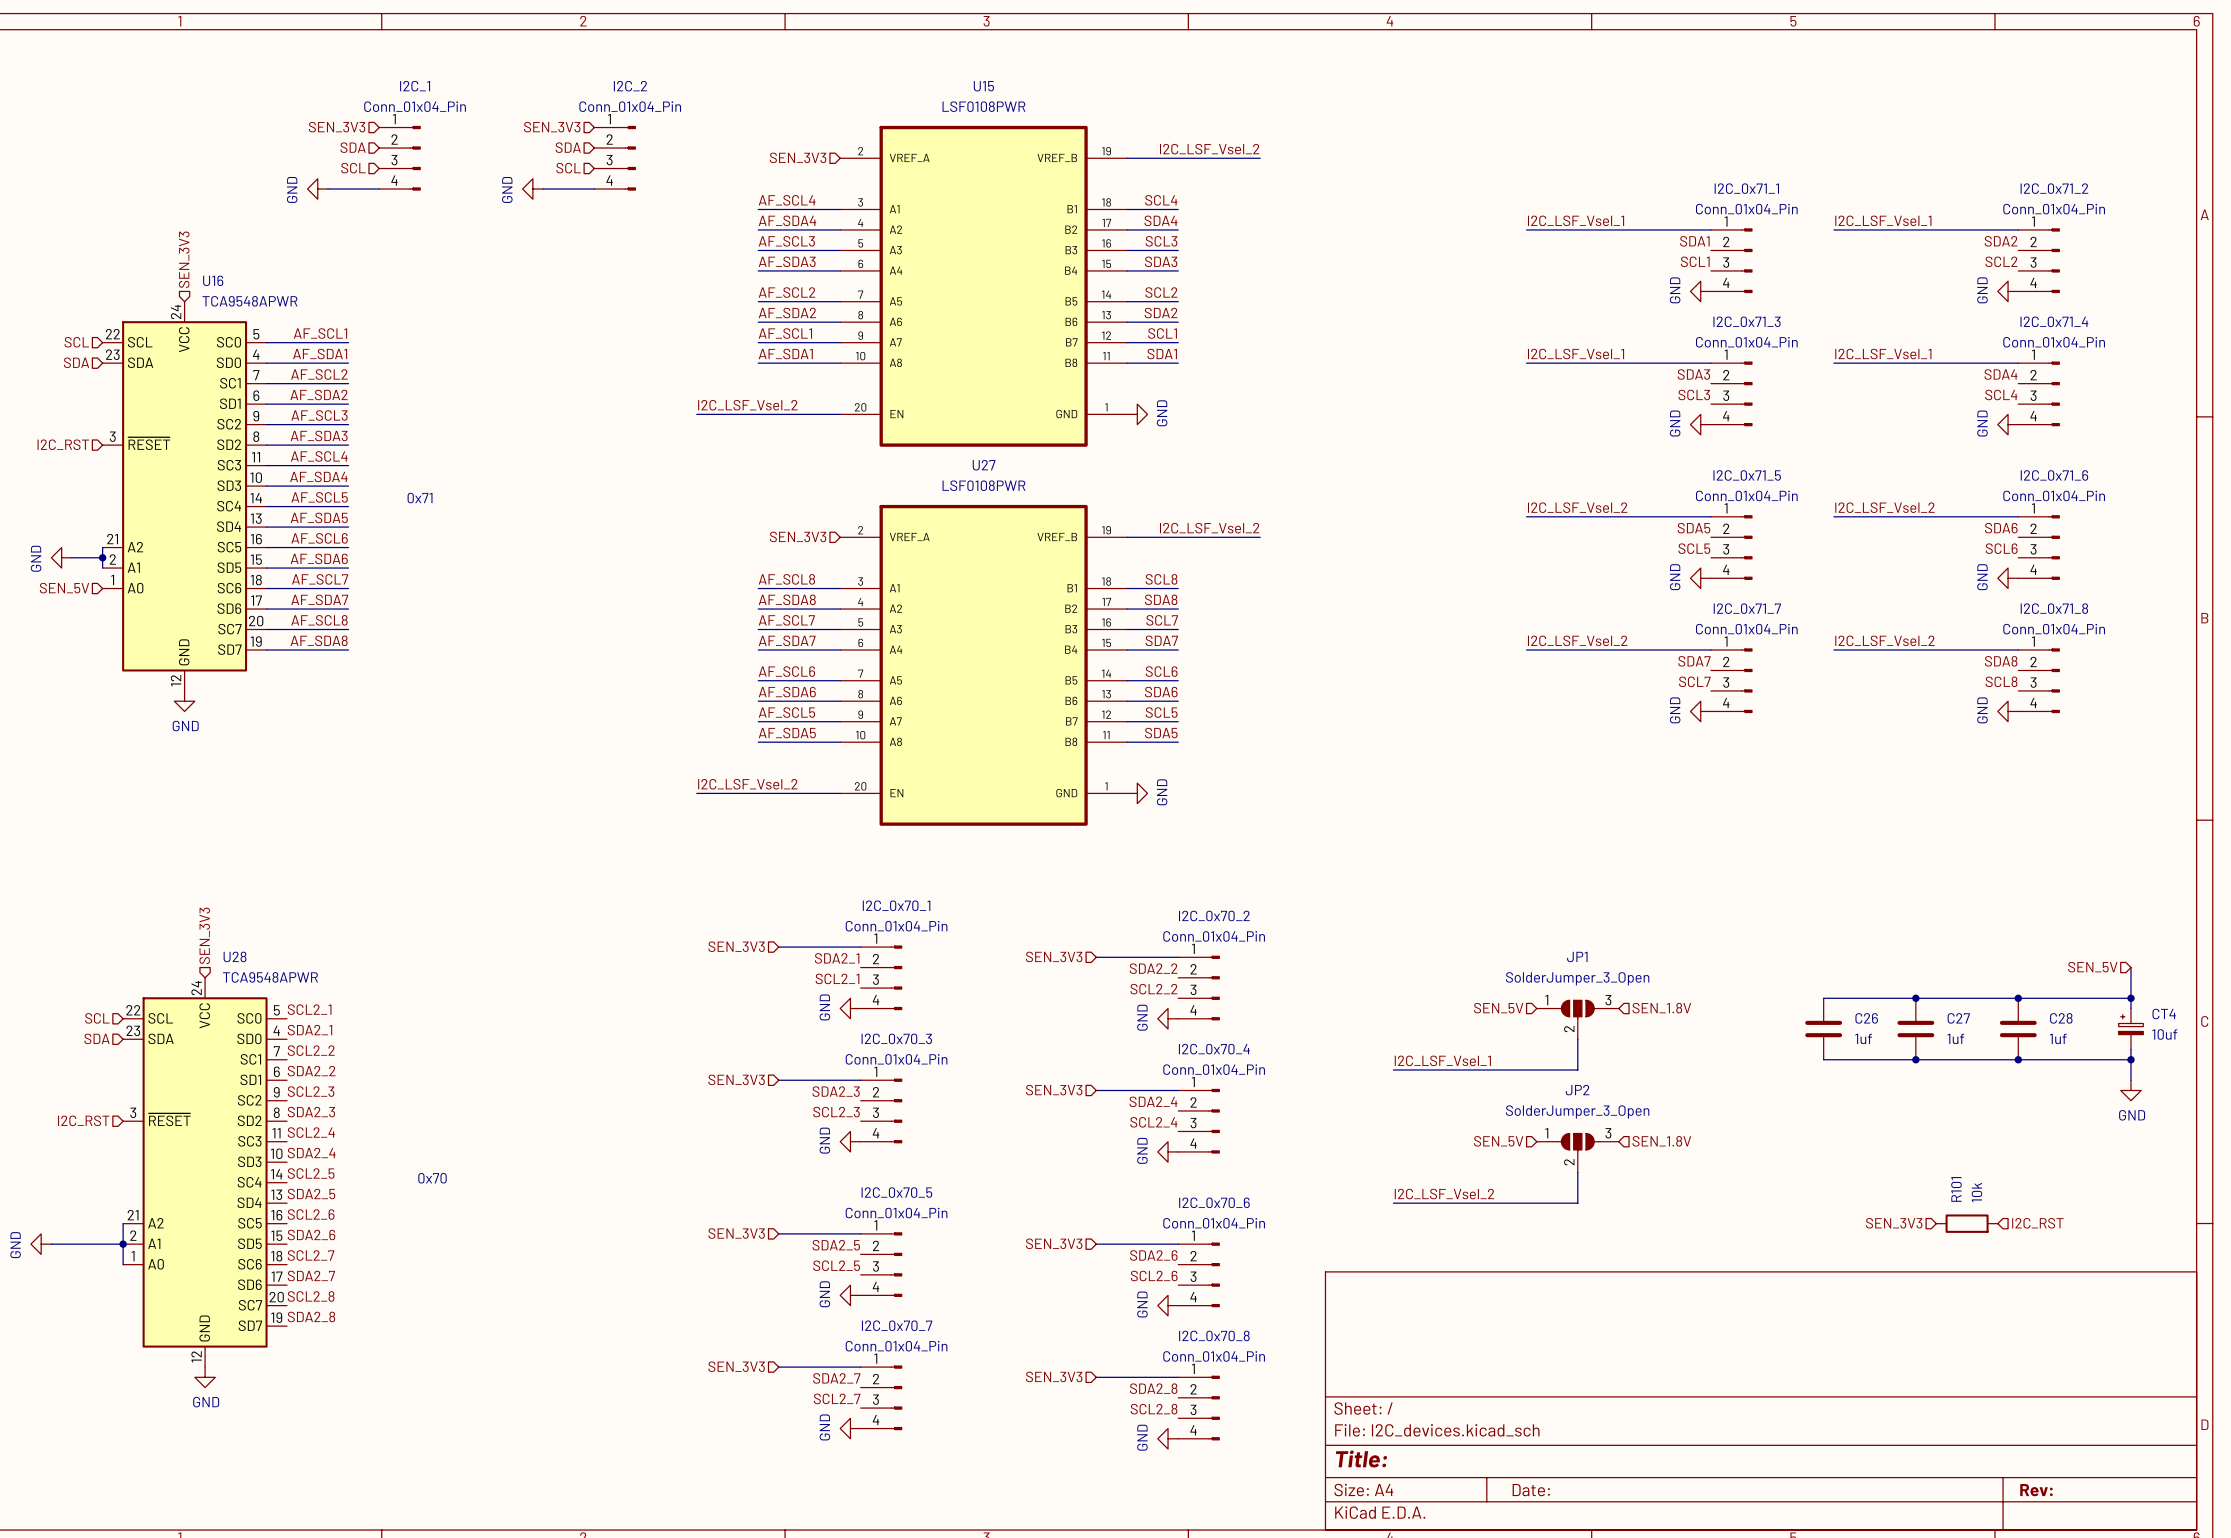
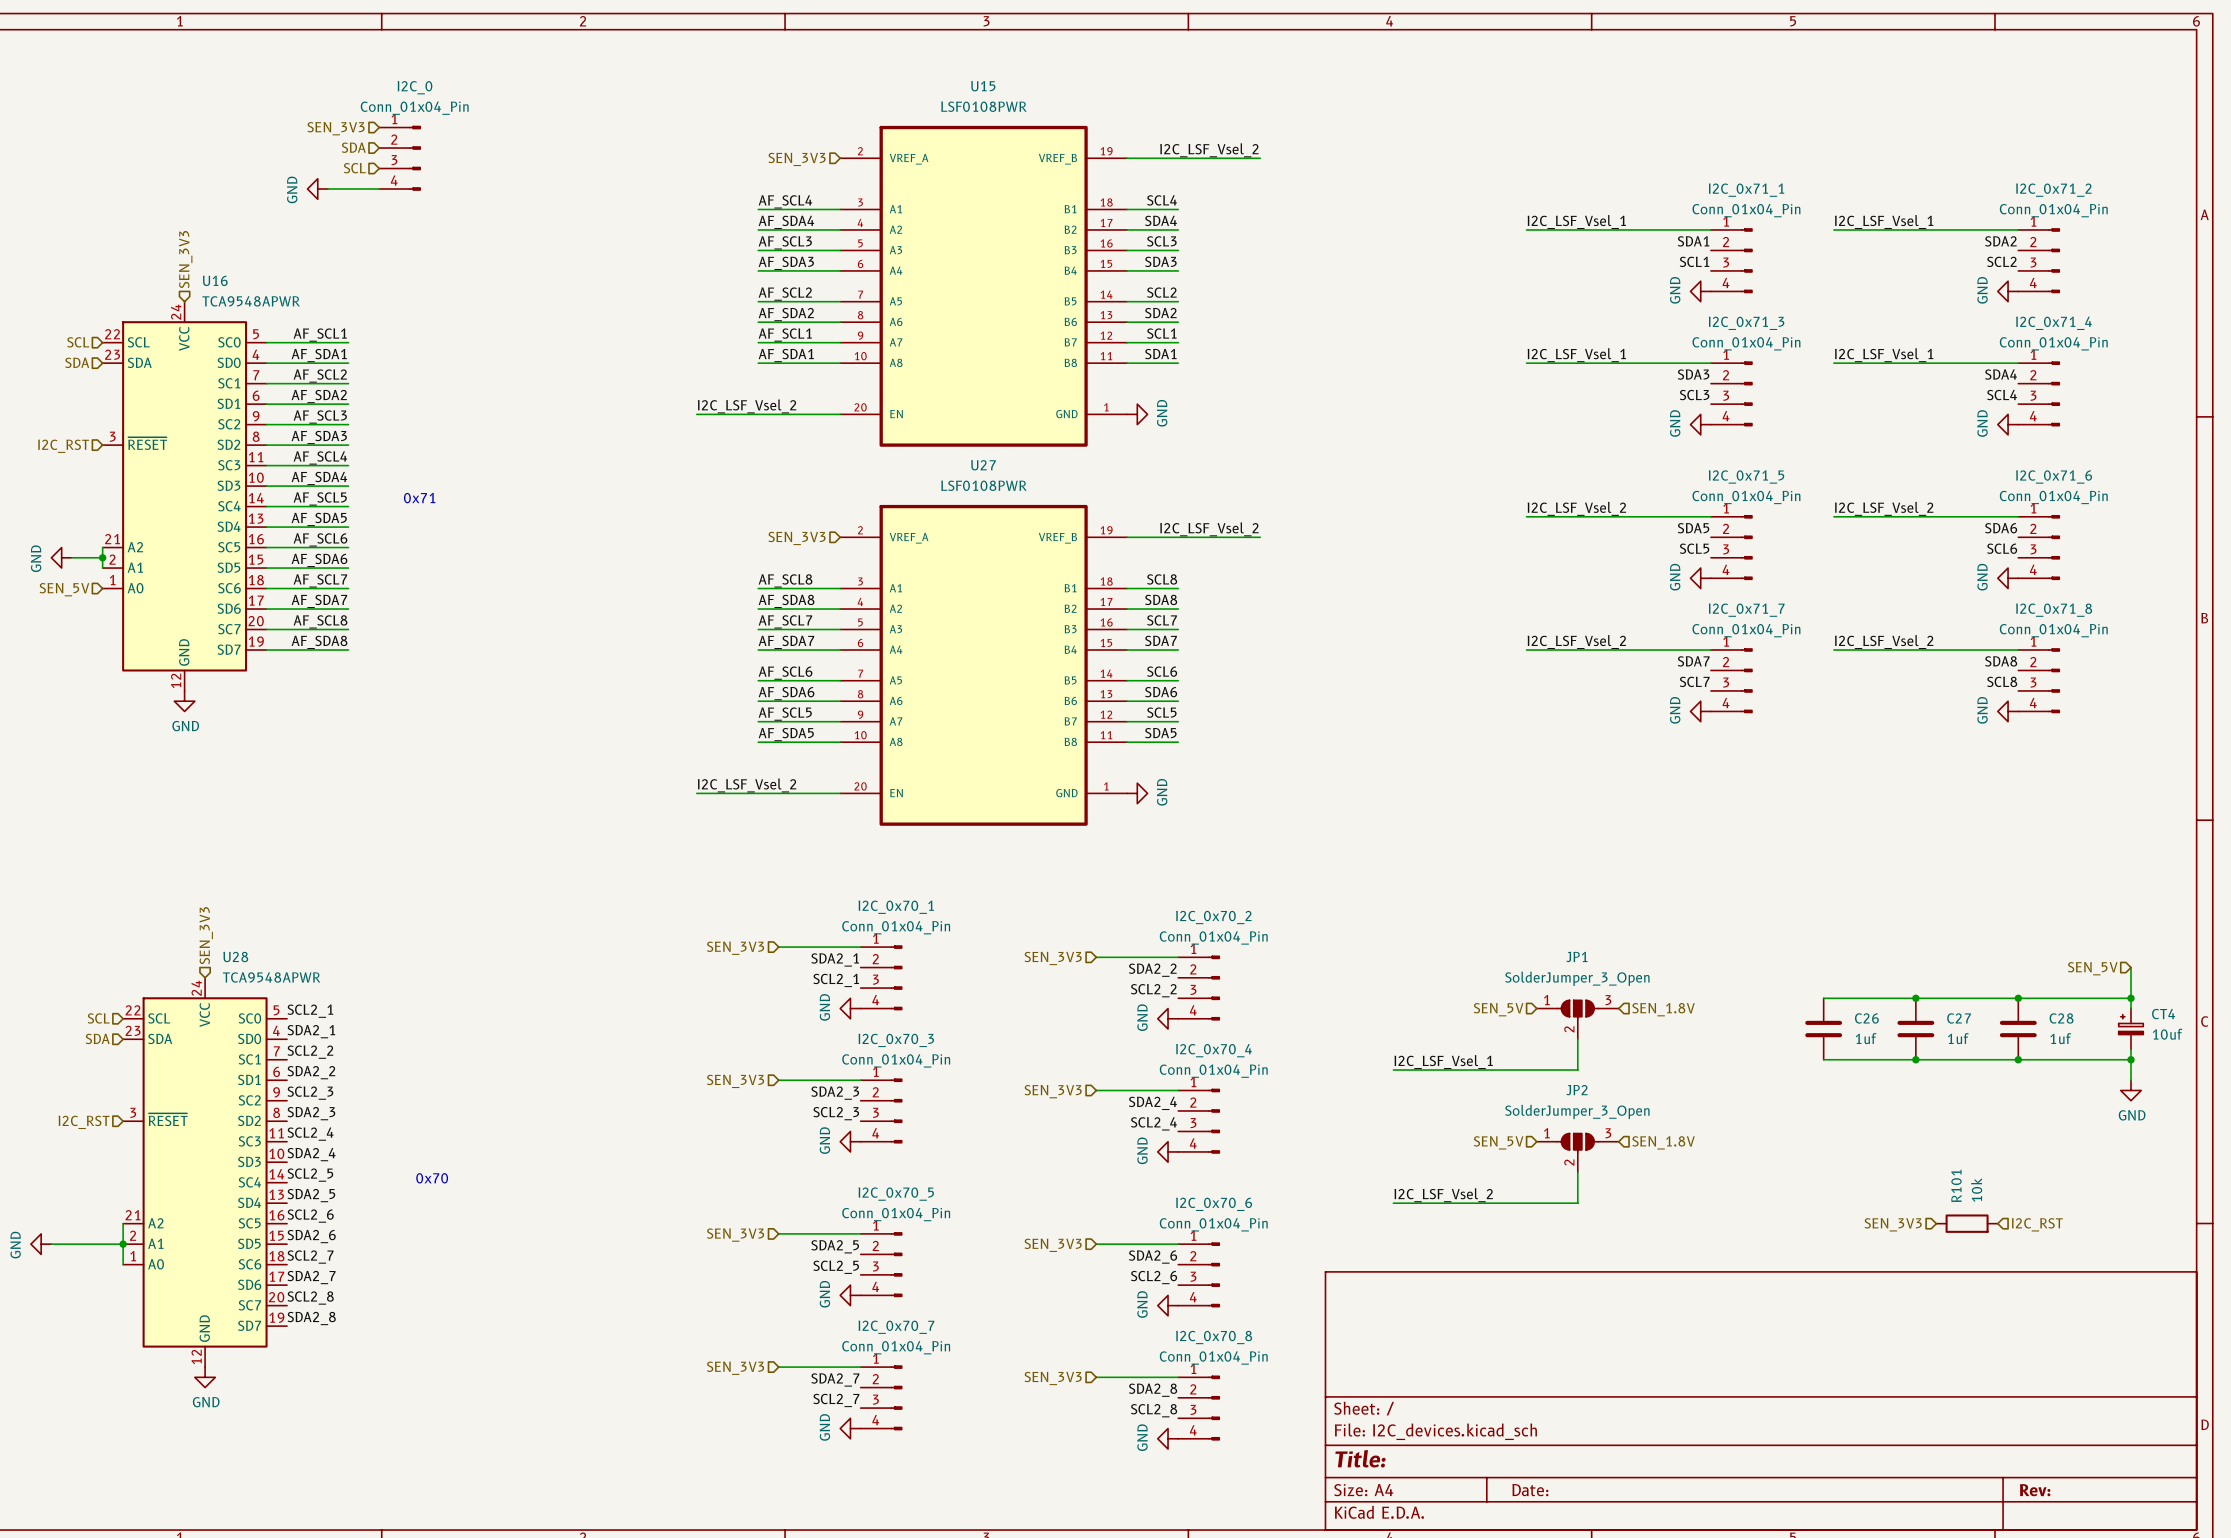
I2C_1 name: I2C_1 (415, 86) -> I2C_0 (414, 87)
hierarchical label: SEN_3V3 (552, 127) -> none
hierarchical label: SDA (568, 147) -> none
I2C_2: Conn_01x04_Pin (615, 158) -> none
hierarchical label: SCL (568, 168) -> none
power symbol: GND (532, 189) -> none
wire: (543, 189) (594, 189) -> none

